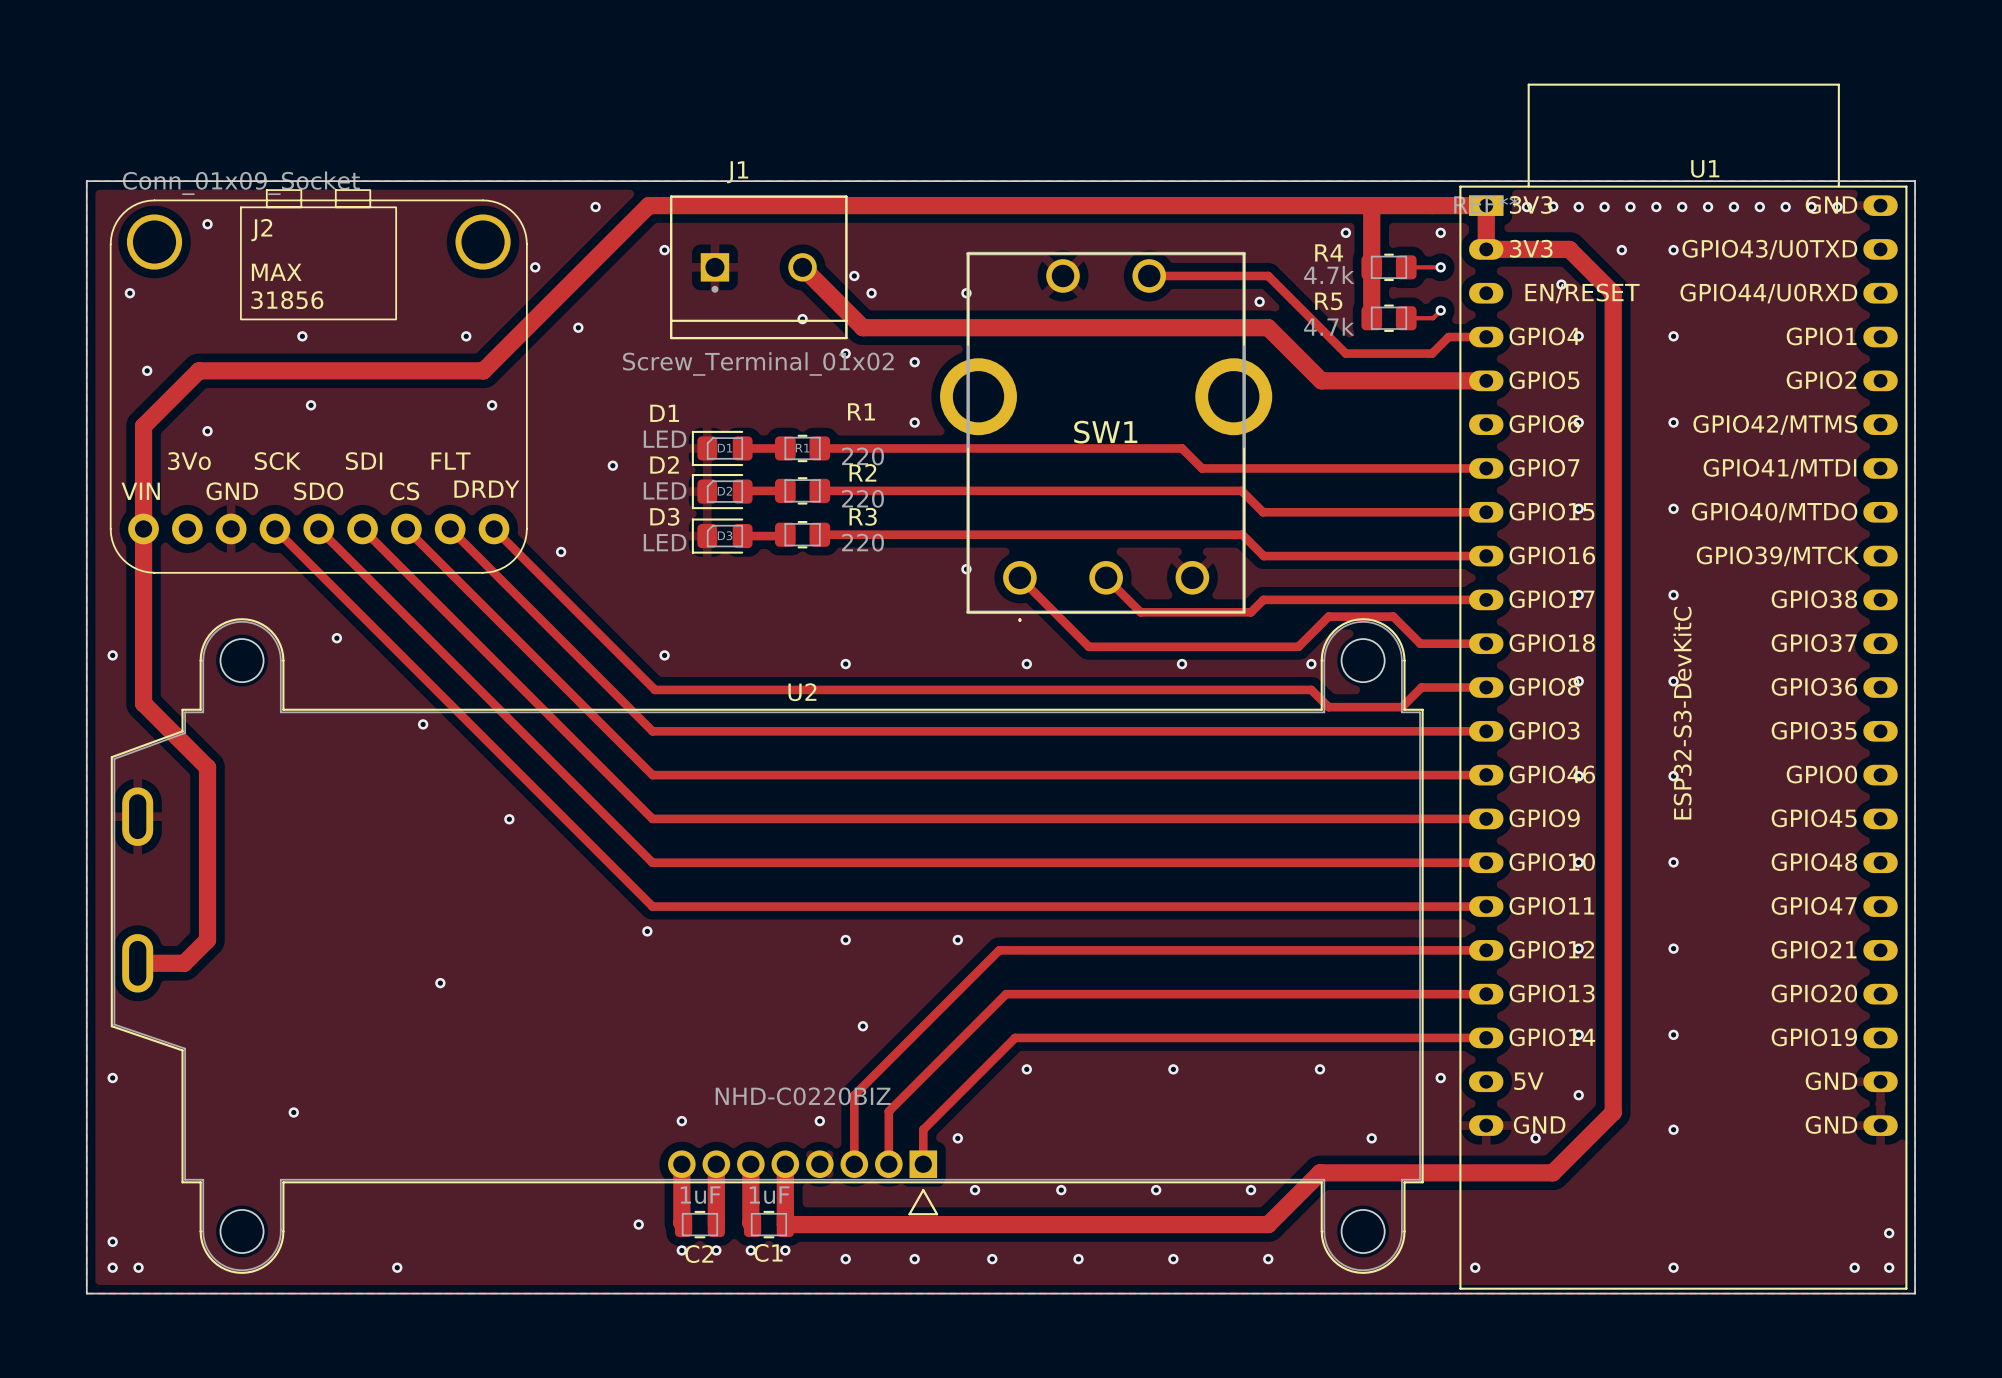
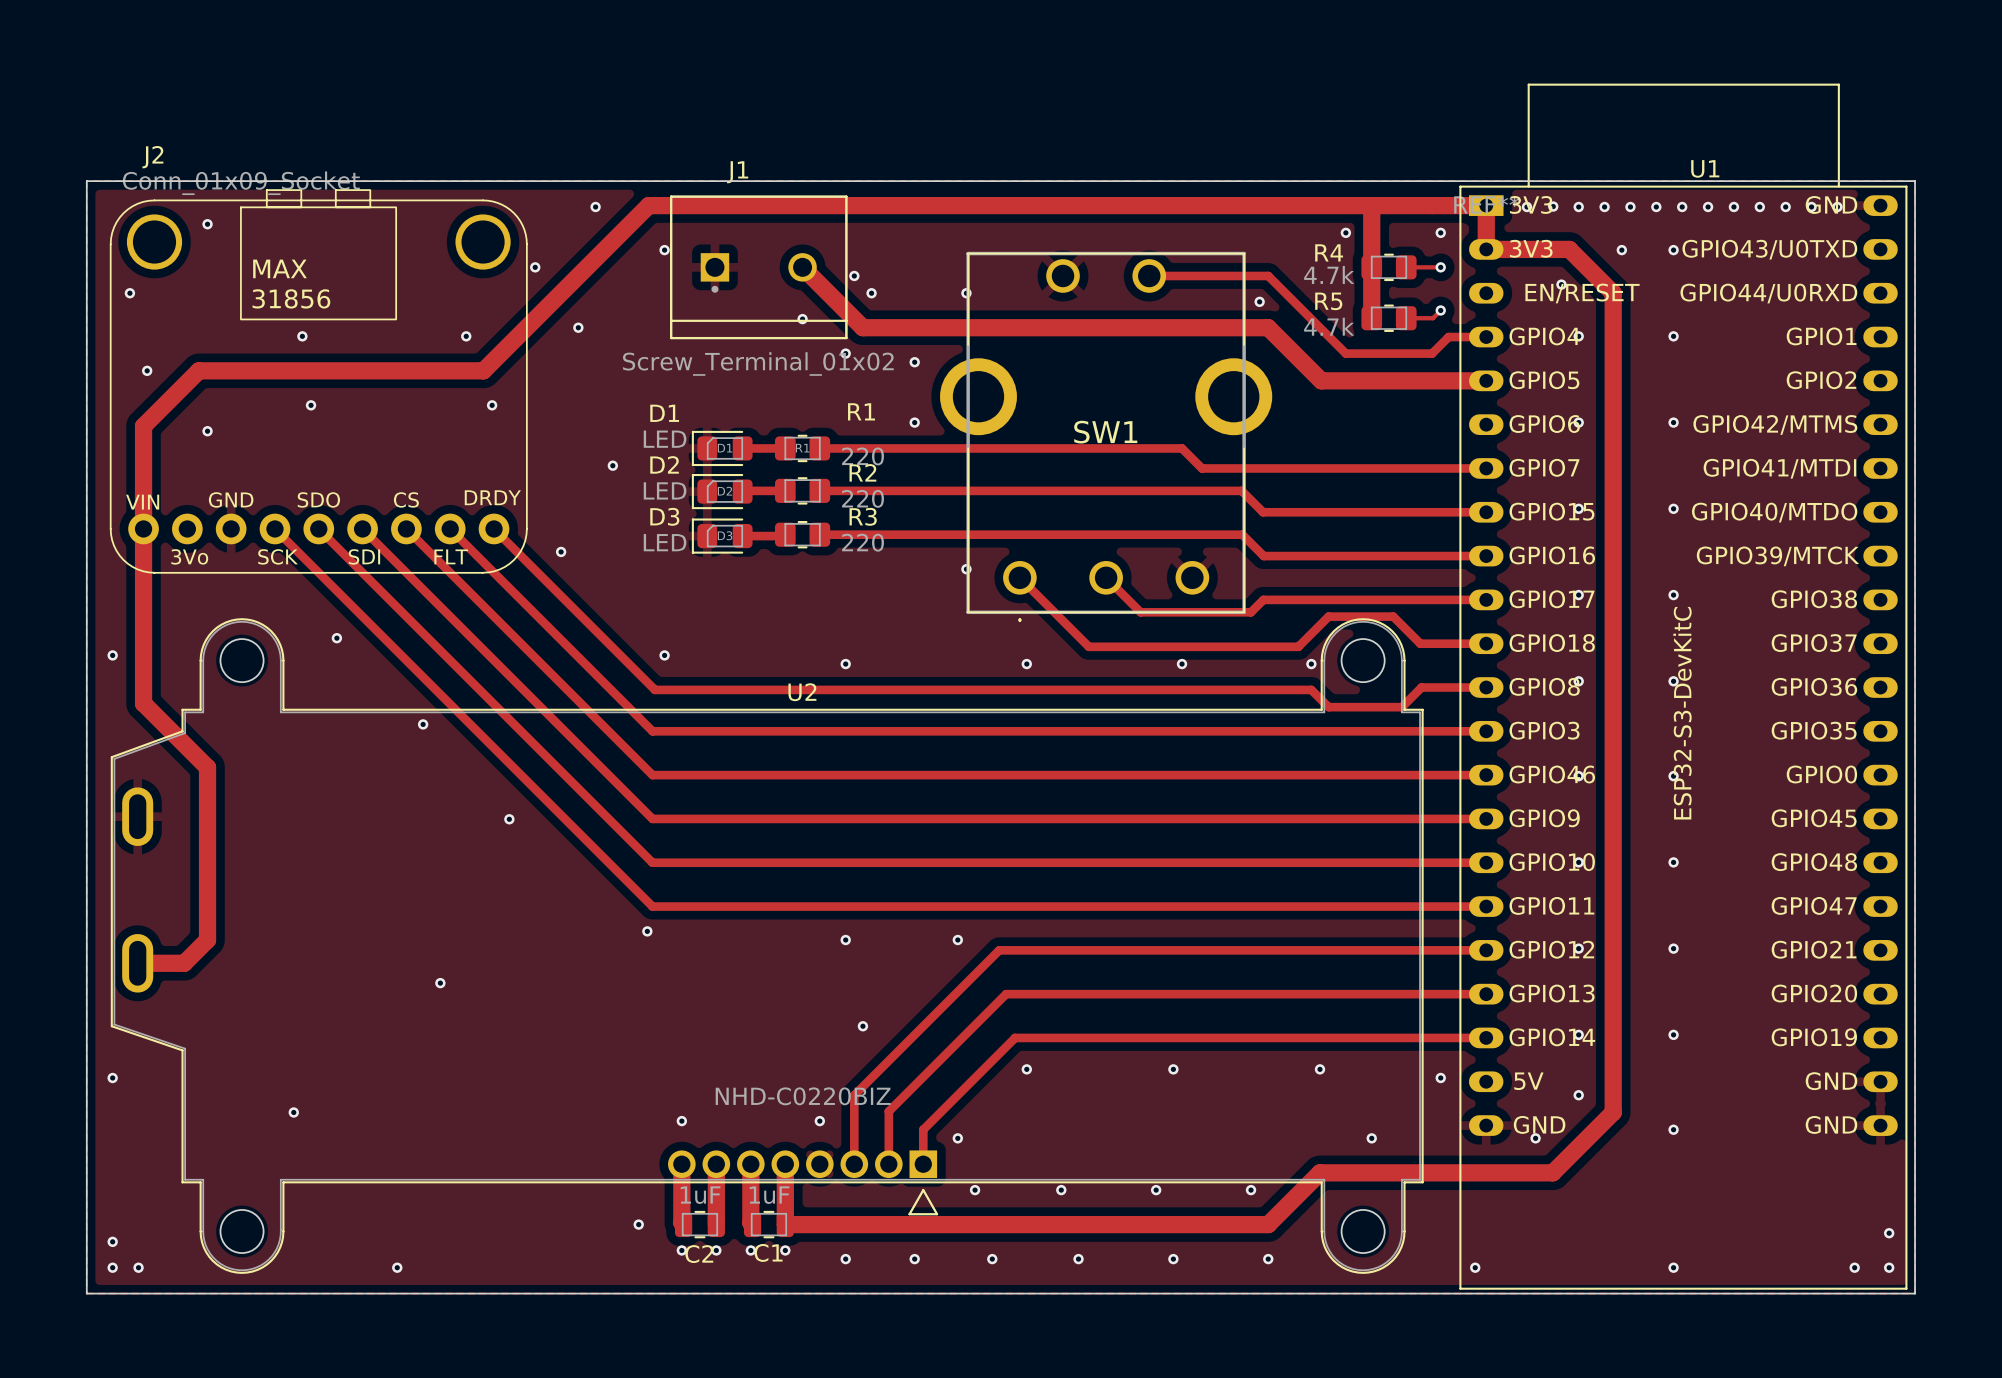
J2 footprint: [110, 189, 528, 574] -> [110, 189, 528, 574]
J2 name position: J2 (261, 230) -> J2 (152, 157)

